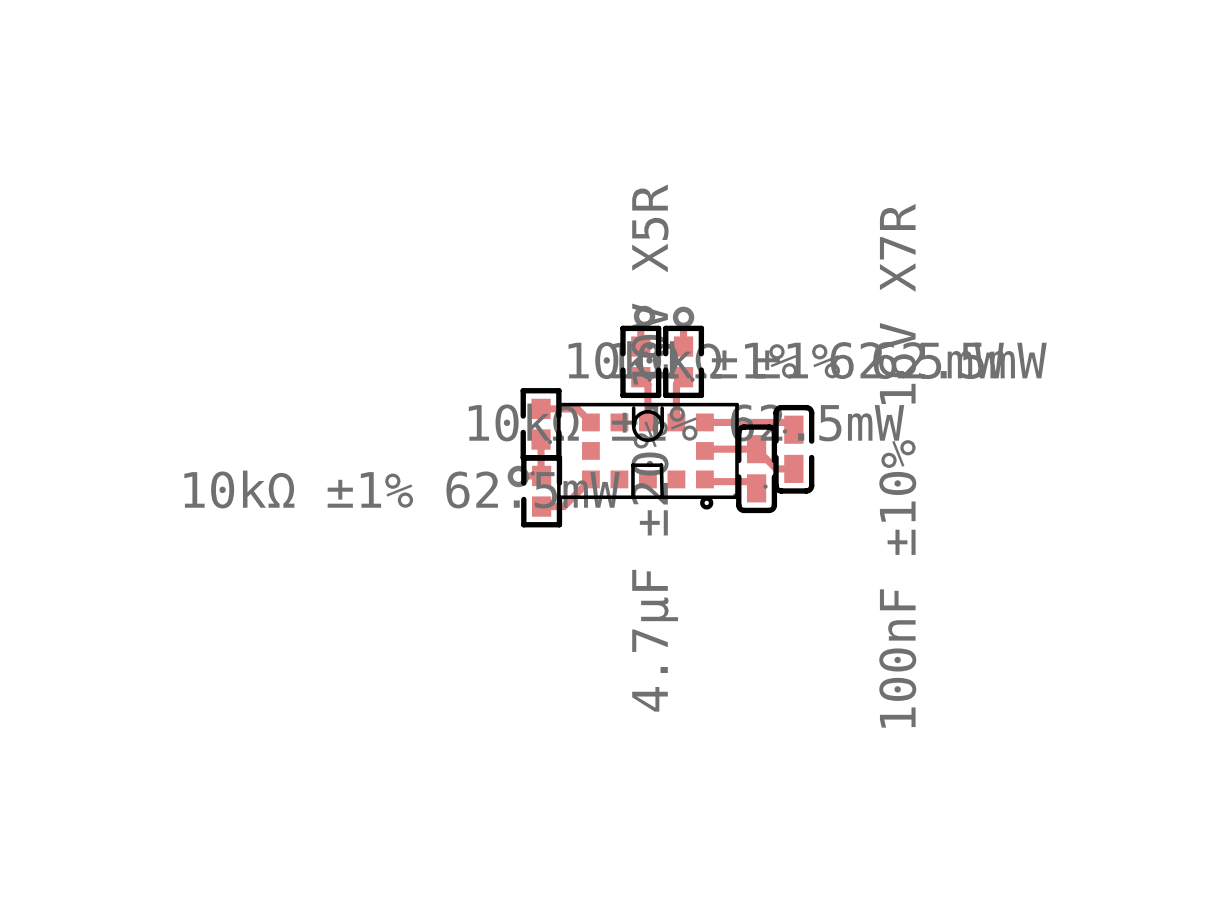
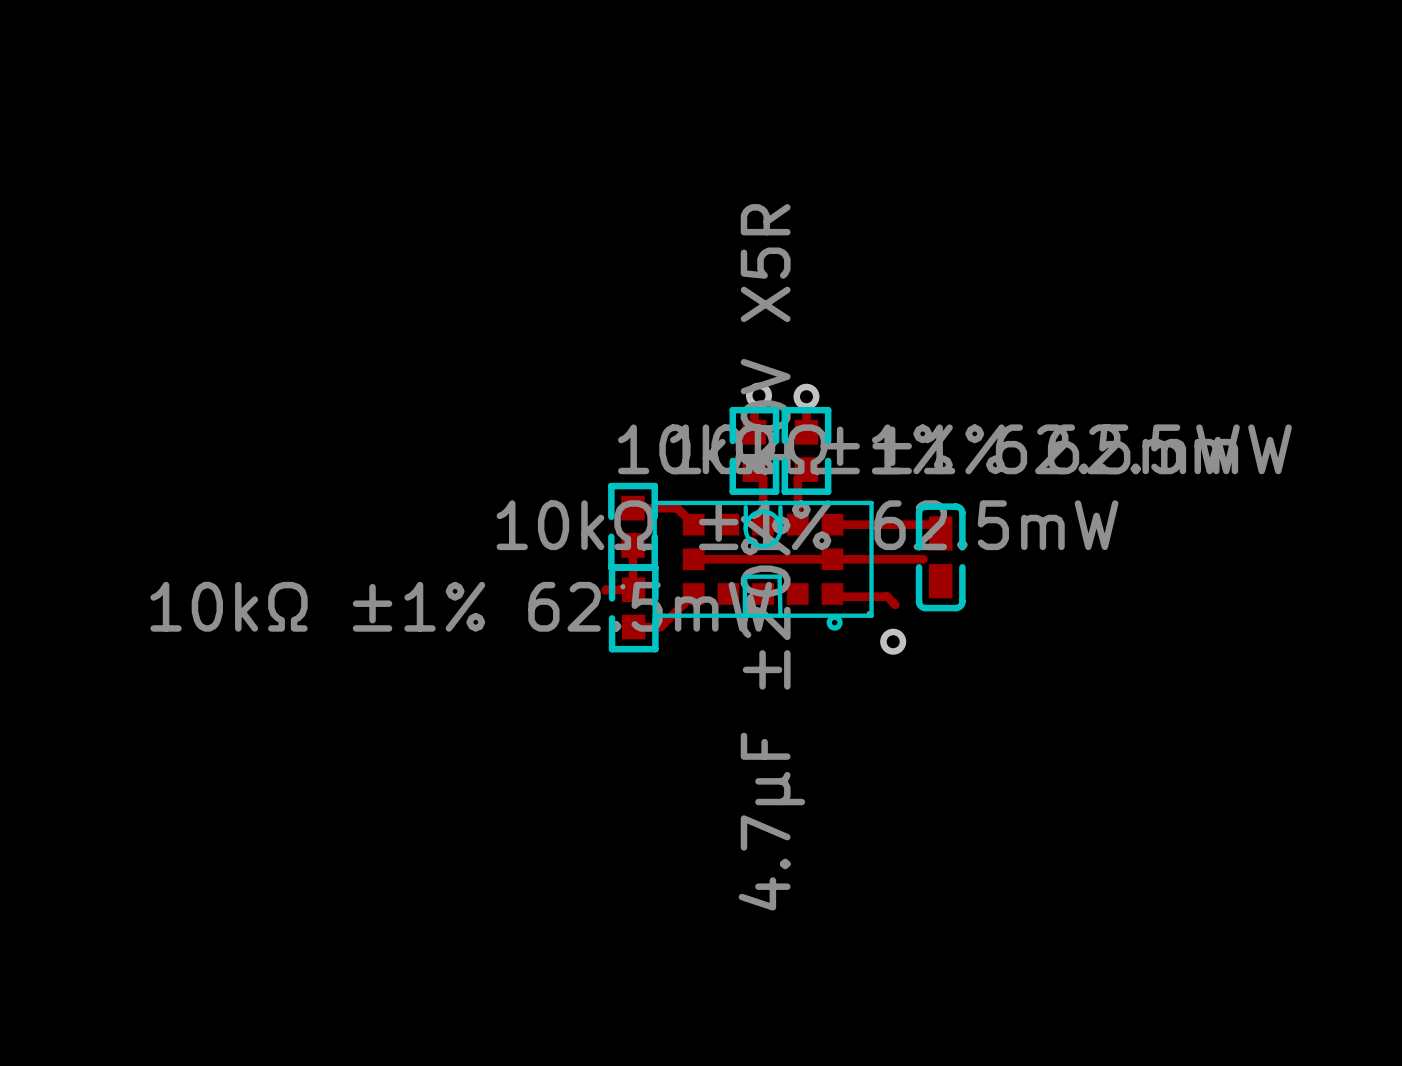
track: none -> (693, 559) (923, 559)
track: (704, 450) (706, 449) (756, 449) (776, 468) (793, 468) -> none
part: 100nF ±10% 16V X7R (756, 468) -> none
via: (518, 476) -> none
via: none -> (893, 641)

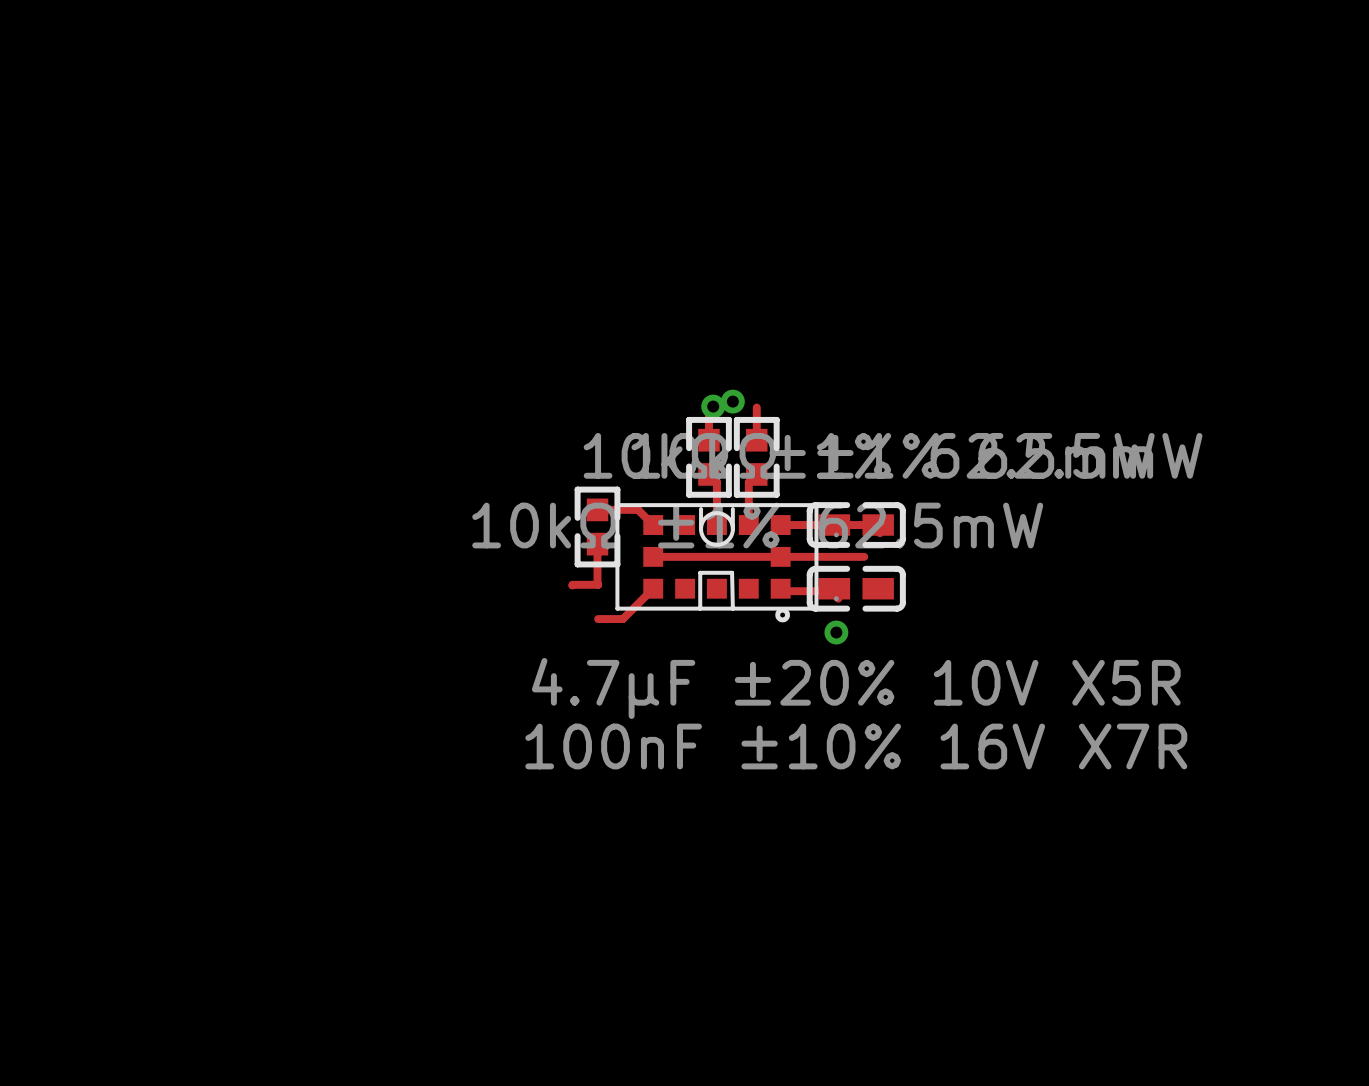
via position: (806, 396) -> (732, 401)
part rotation: 0° (940, 557) -> 90° counterclockwise (856, 525)
part: none -> 100nF ±10% 16V X7R (856, 588)
part: 10kΩ ±1% 62.5mW (633, 608) -> none

